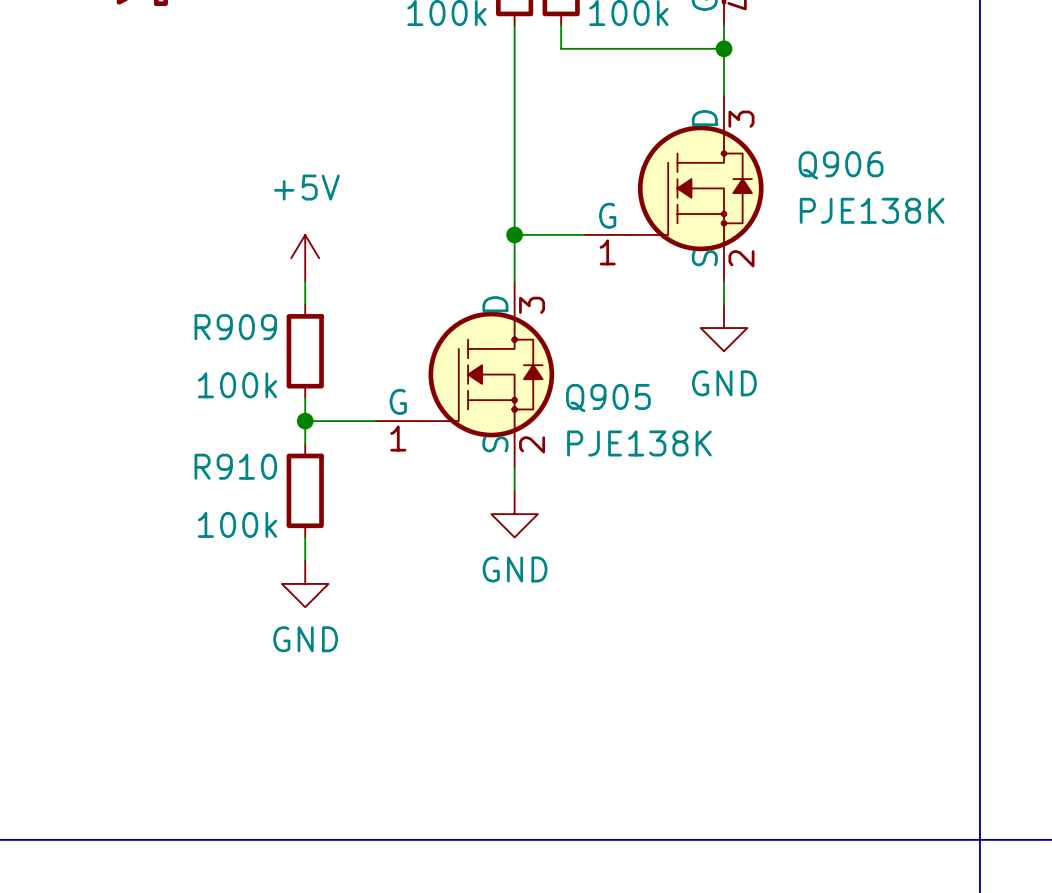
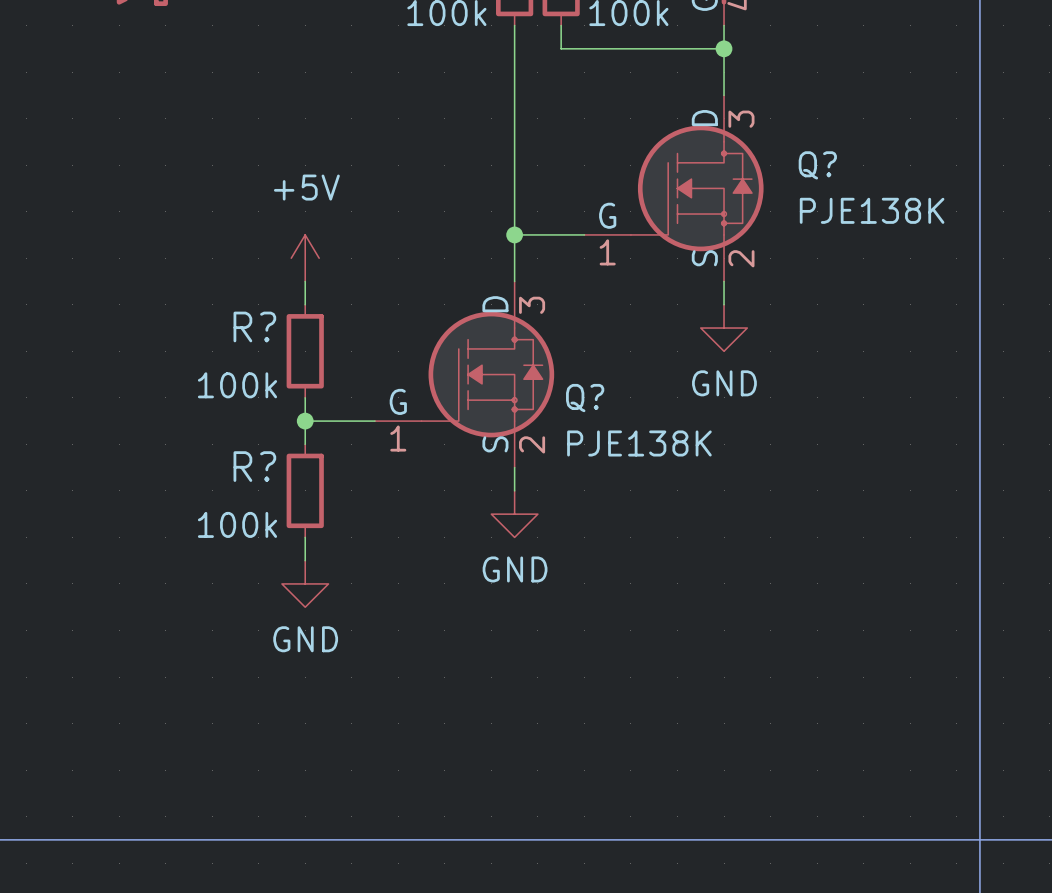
Q906 name: Q906 (841, 165) -> Q? (817, 165)
R909 name: R909 (235, 327) -> R? (254, 326)
Q905 name: Q905 (608, 398) -> Q? (585, 398)
R910 name: R910 (235, 466) -> R? (254, 466)

